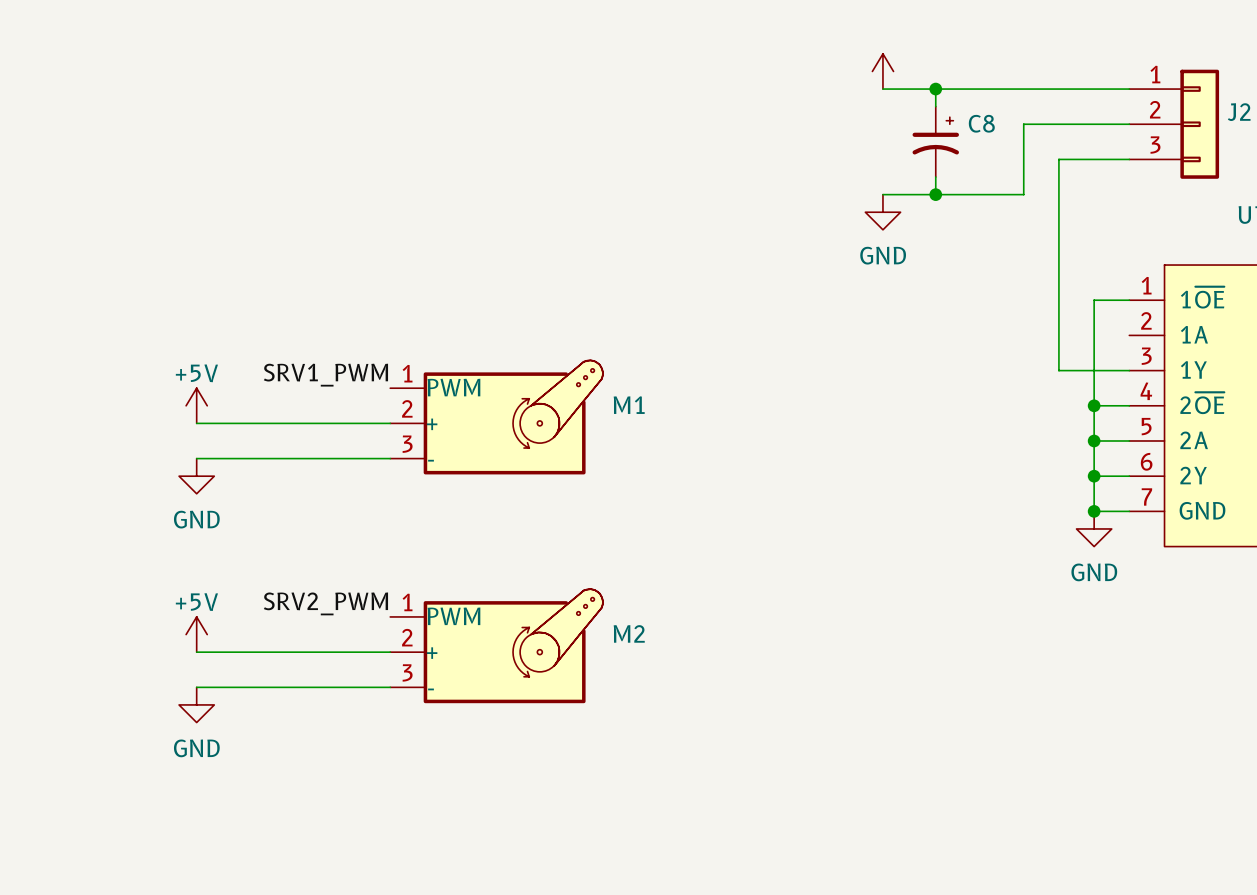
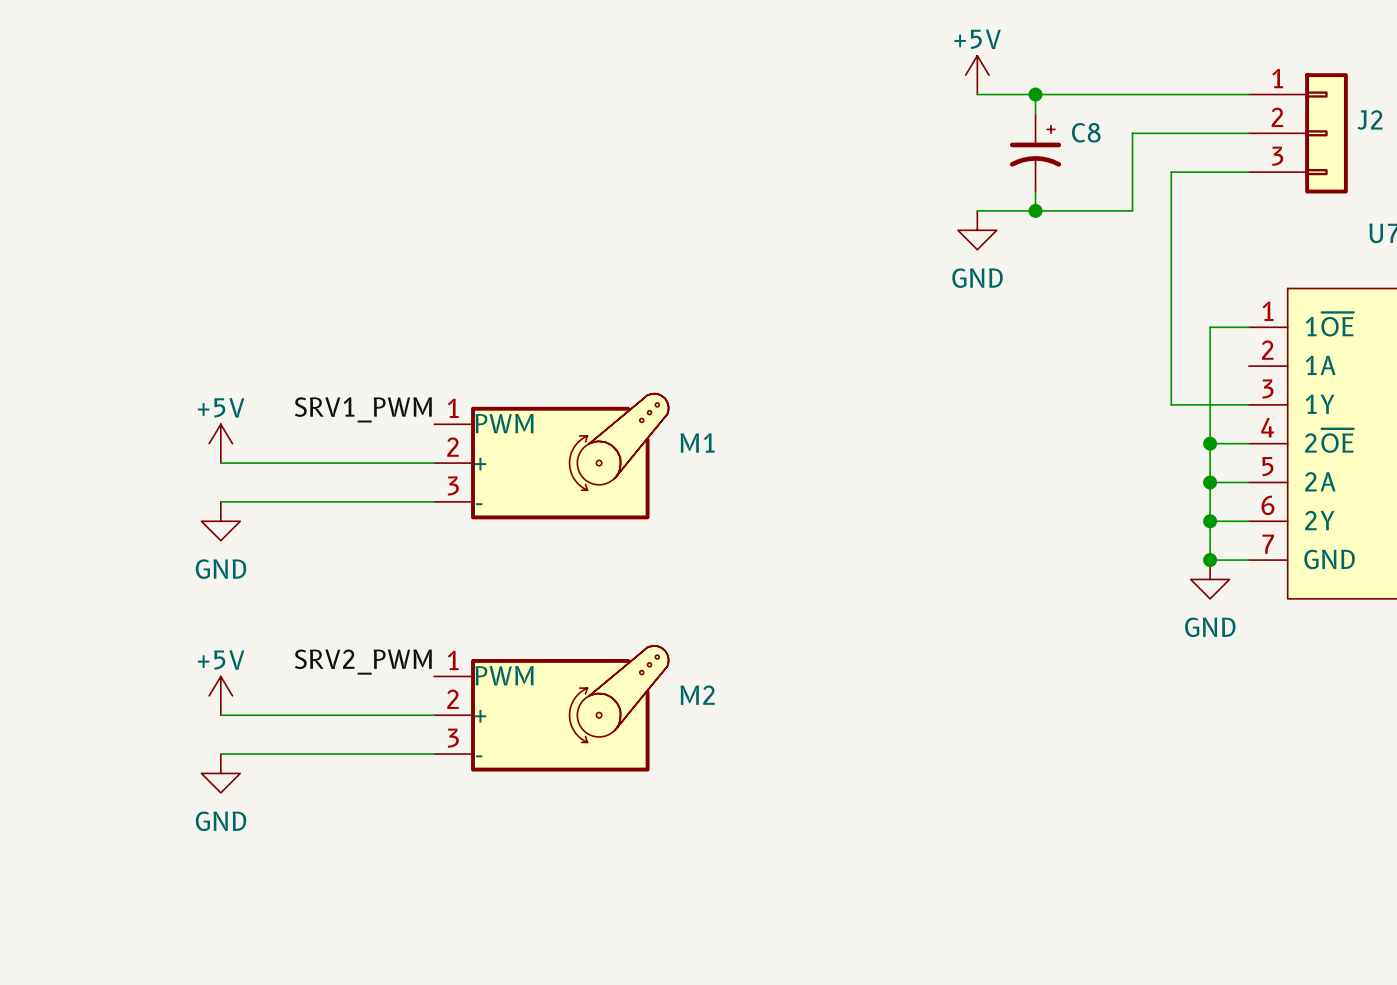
power symbol text: none -> +5V (977, 39)

